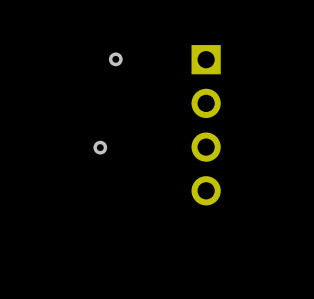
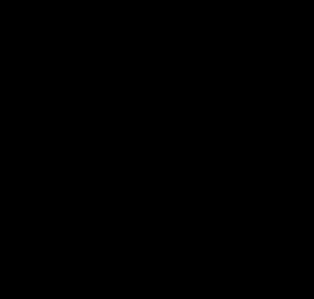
via: (115, 59) -> none
part: (206, 125) -> none
via: (100, 147) -> none

